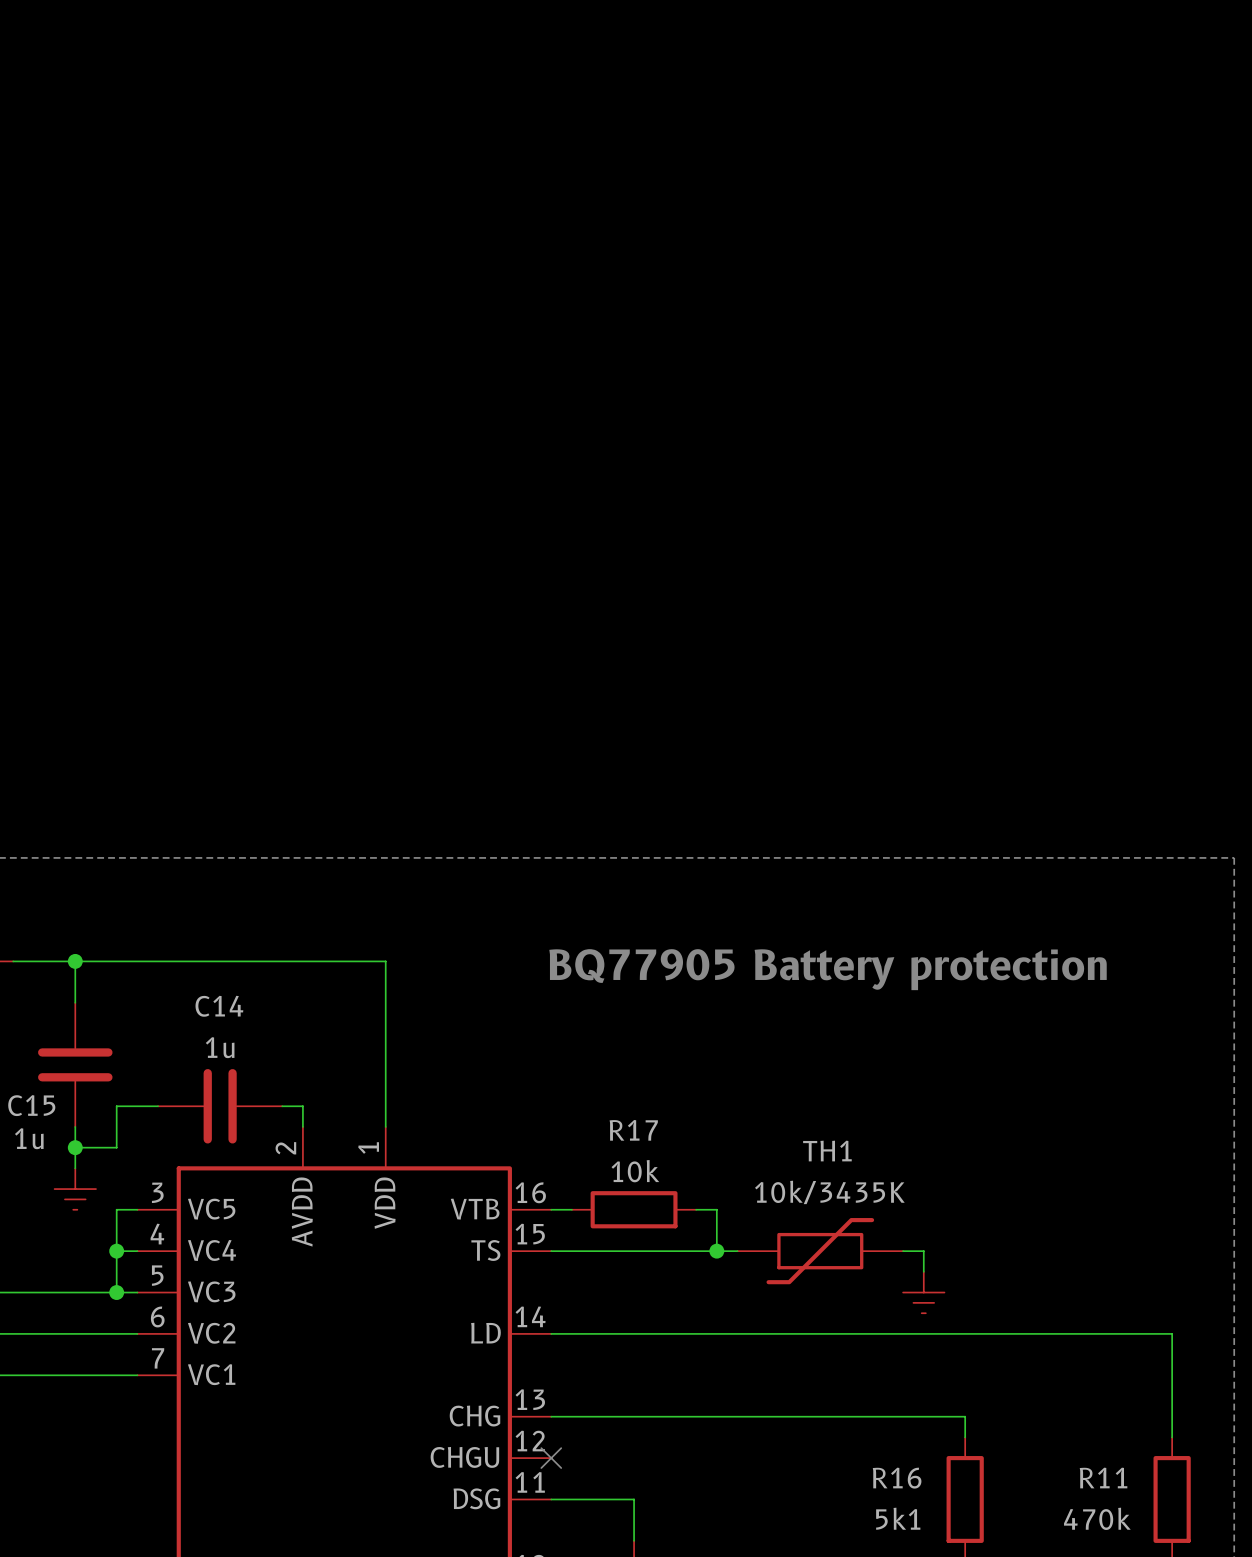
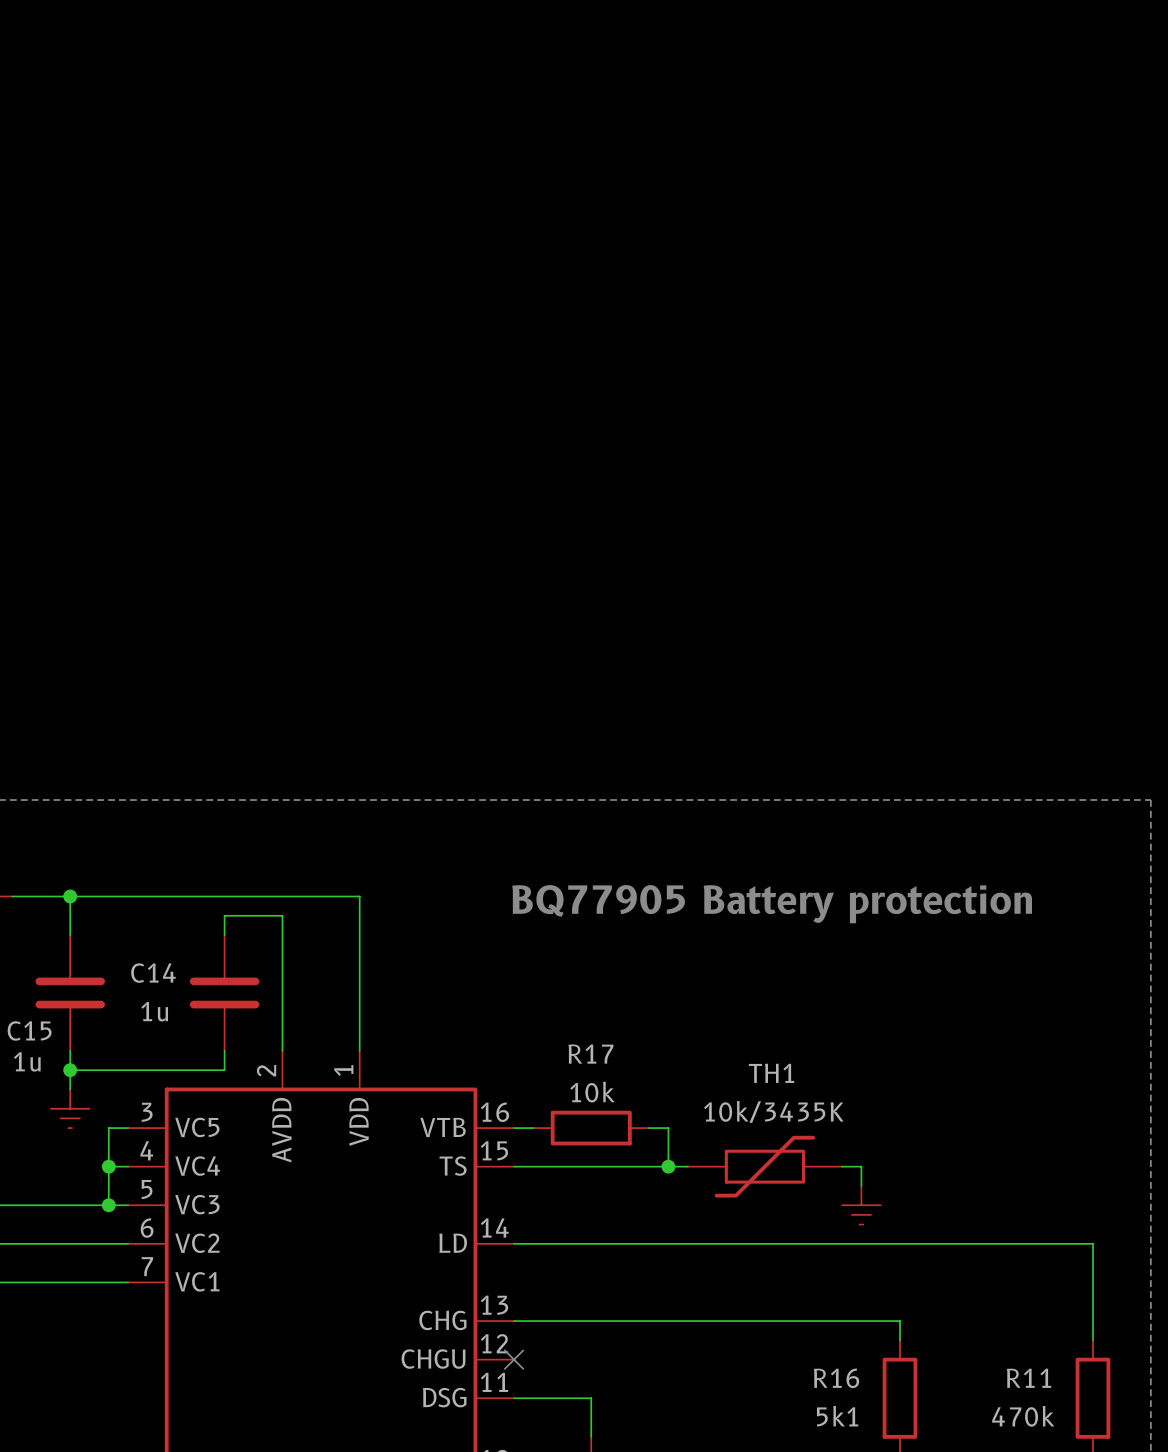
C14 name position: C14 (219, 1006) -> C14 (153, 973)
C14 value position: 1u (220, 1047) -> 1u (154, 1011)
wire: (158, 1106) (116, 1106) (116, 1147) -> (224, 1050) (224, 1070) (108, 1070)
C14 rotation: 0° (220, 1106) -> 90° clockwise (224, 992)
wire: (282, 1106) (302, 1106) -> (224, 935) (224, 915) (282, 915) (282, 1031)

